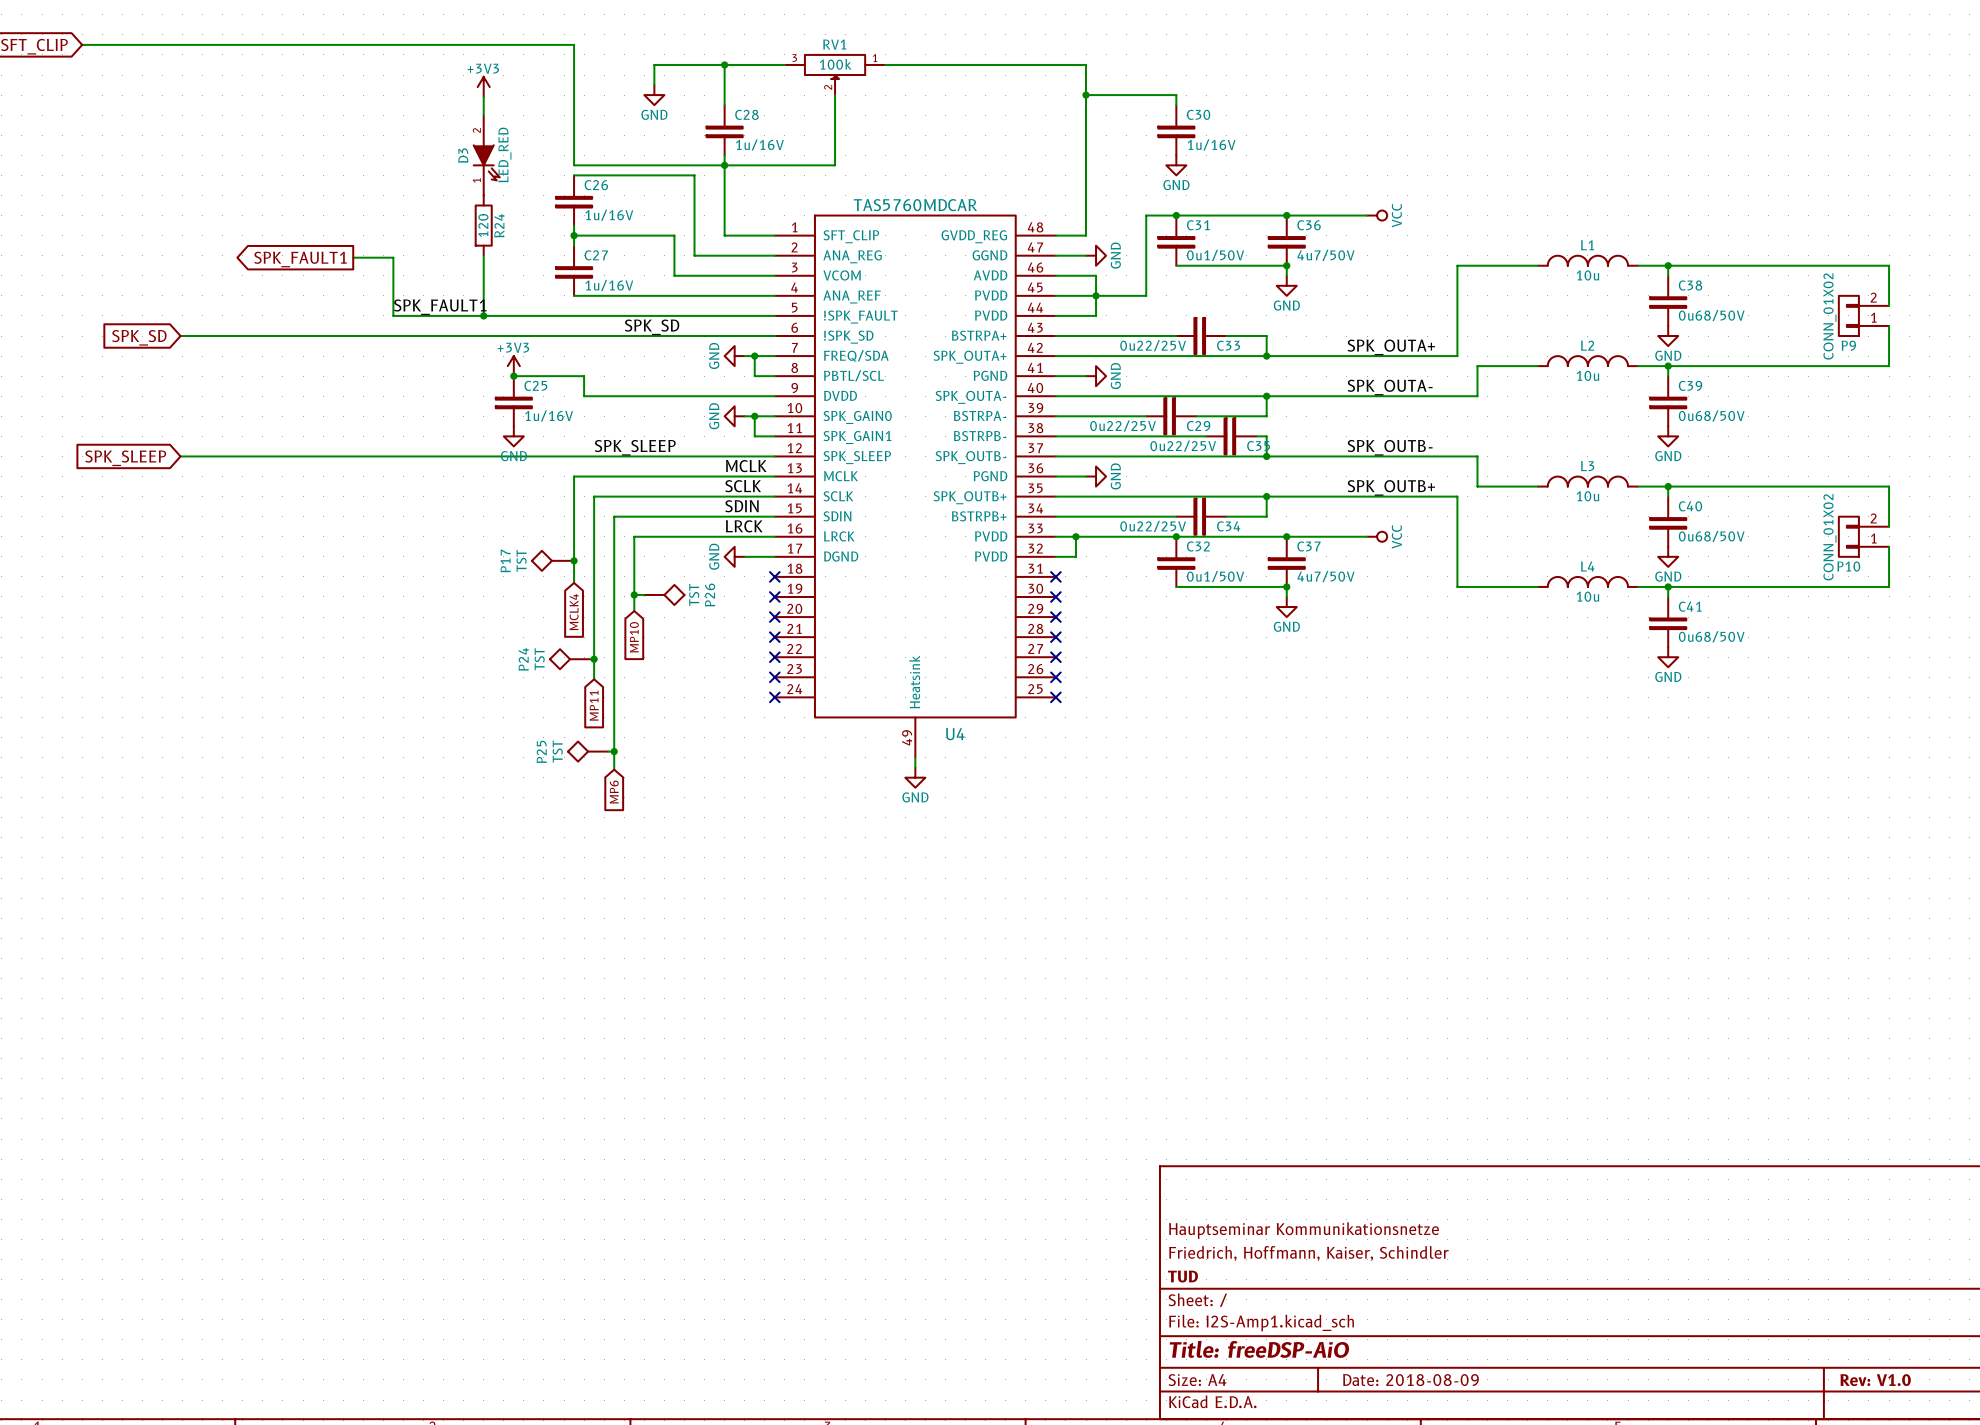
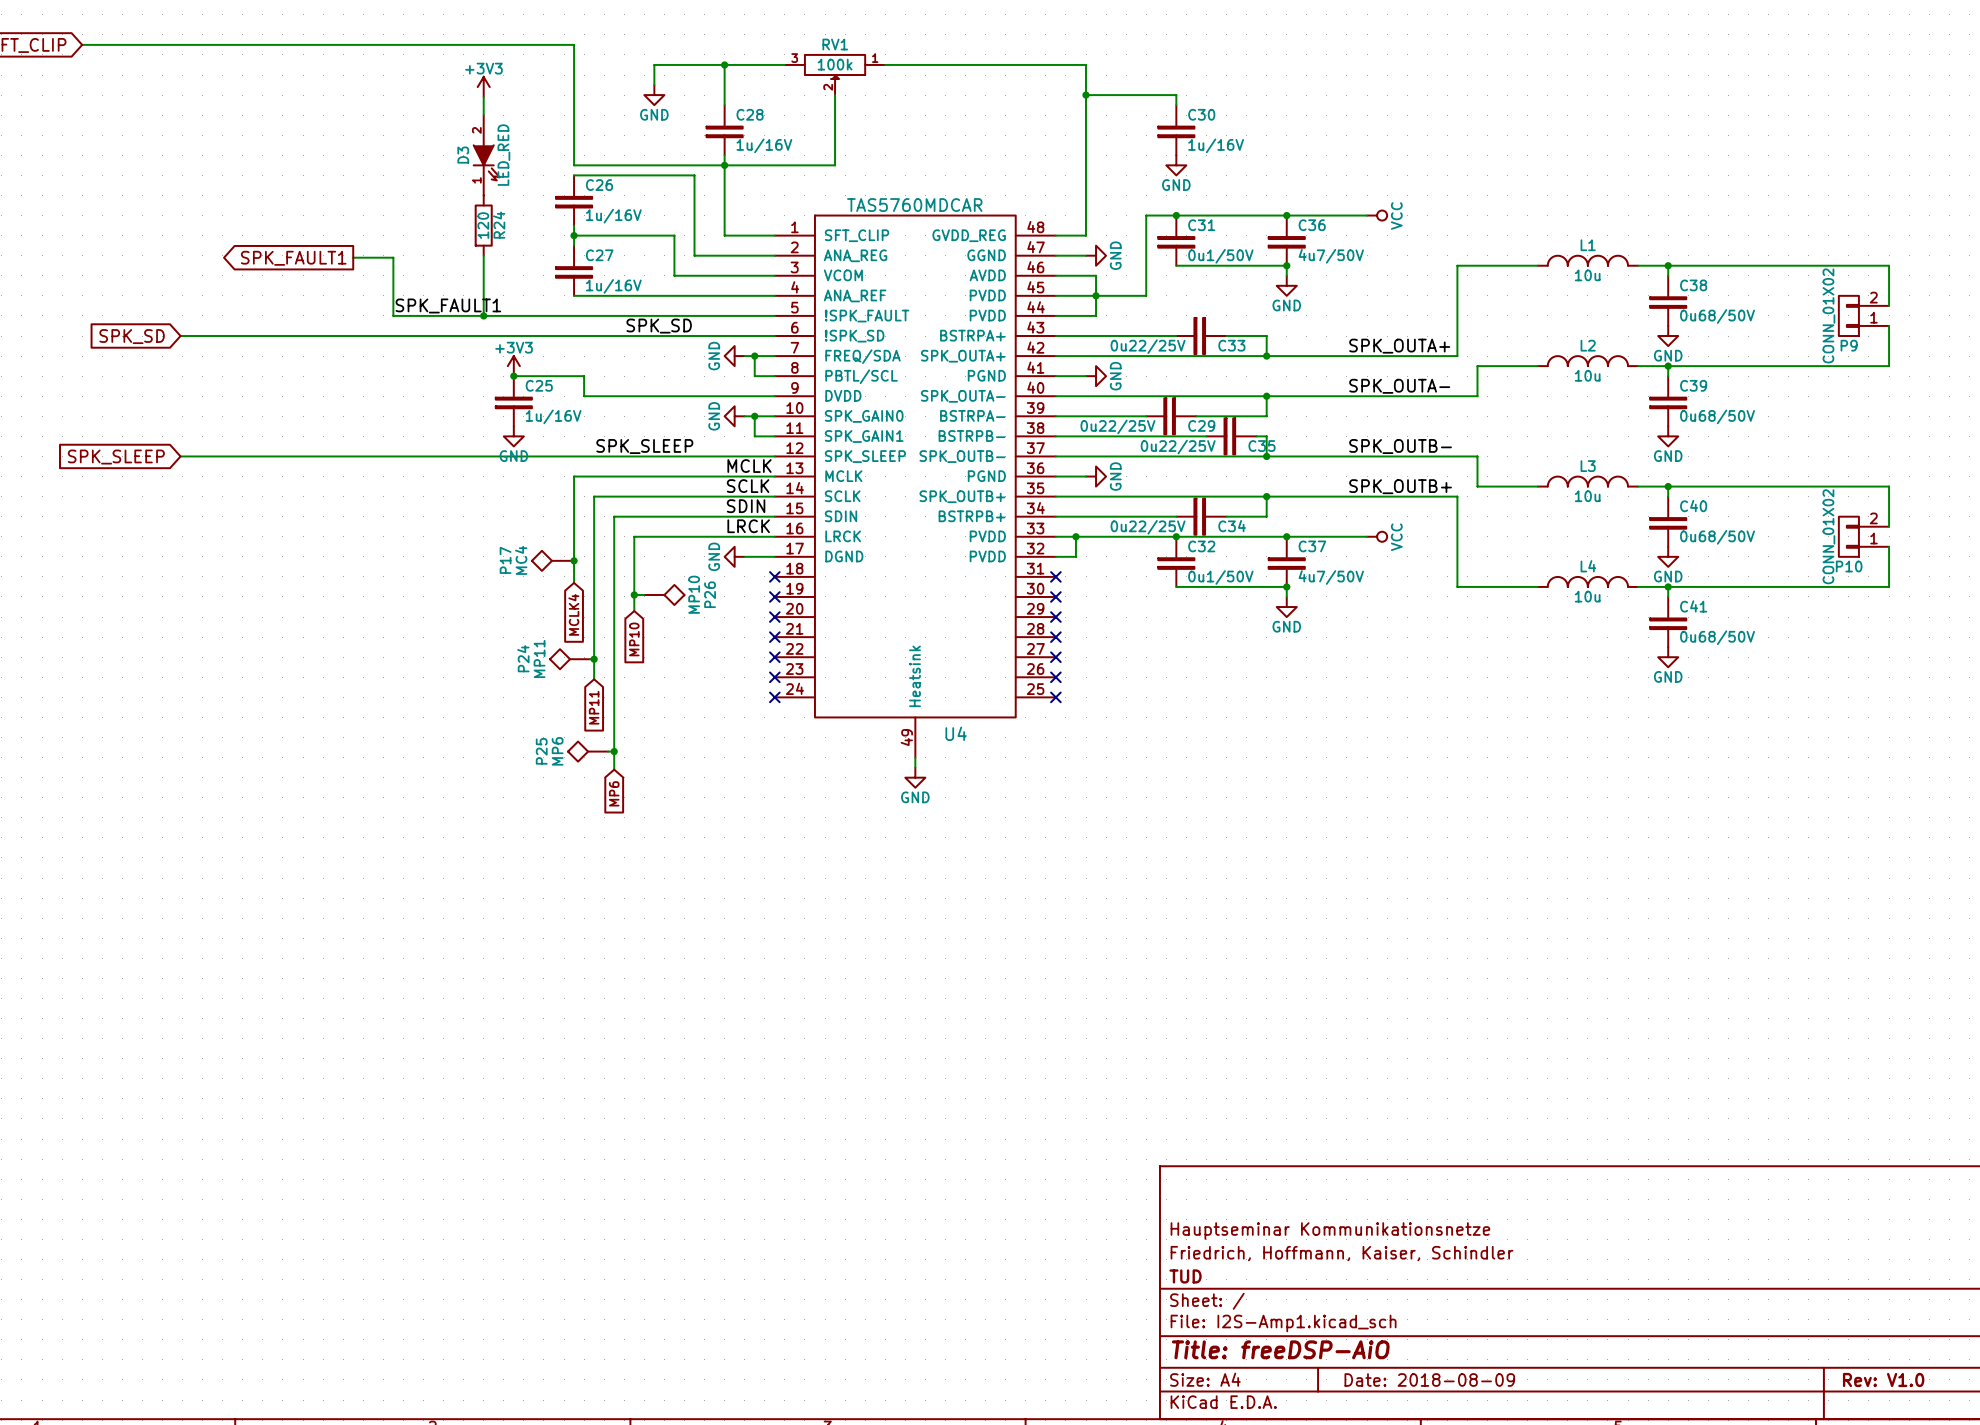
P17 value: TST (521, 560) -> MC4 (521, 560)
P26 value: TST (694, 594) -> MP10 (694, 594)
P24 value: TST (539, 659) -> MP11 (539, 658)
P25 value: TST (557, 751) -> MP6 (557, 751)

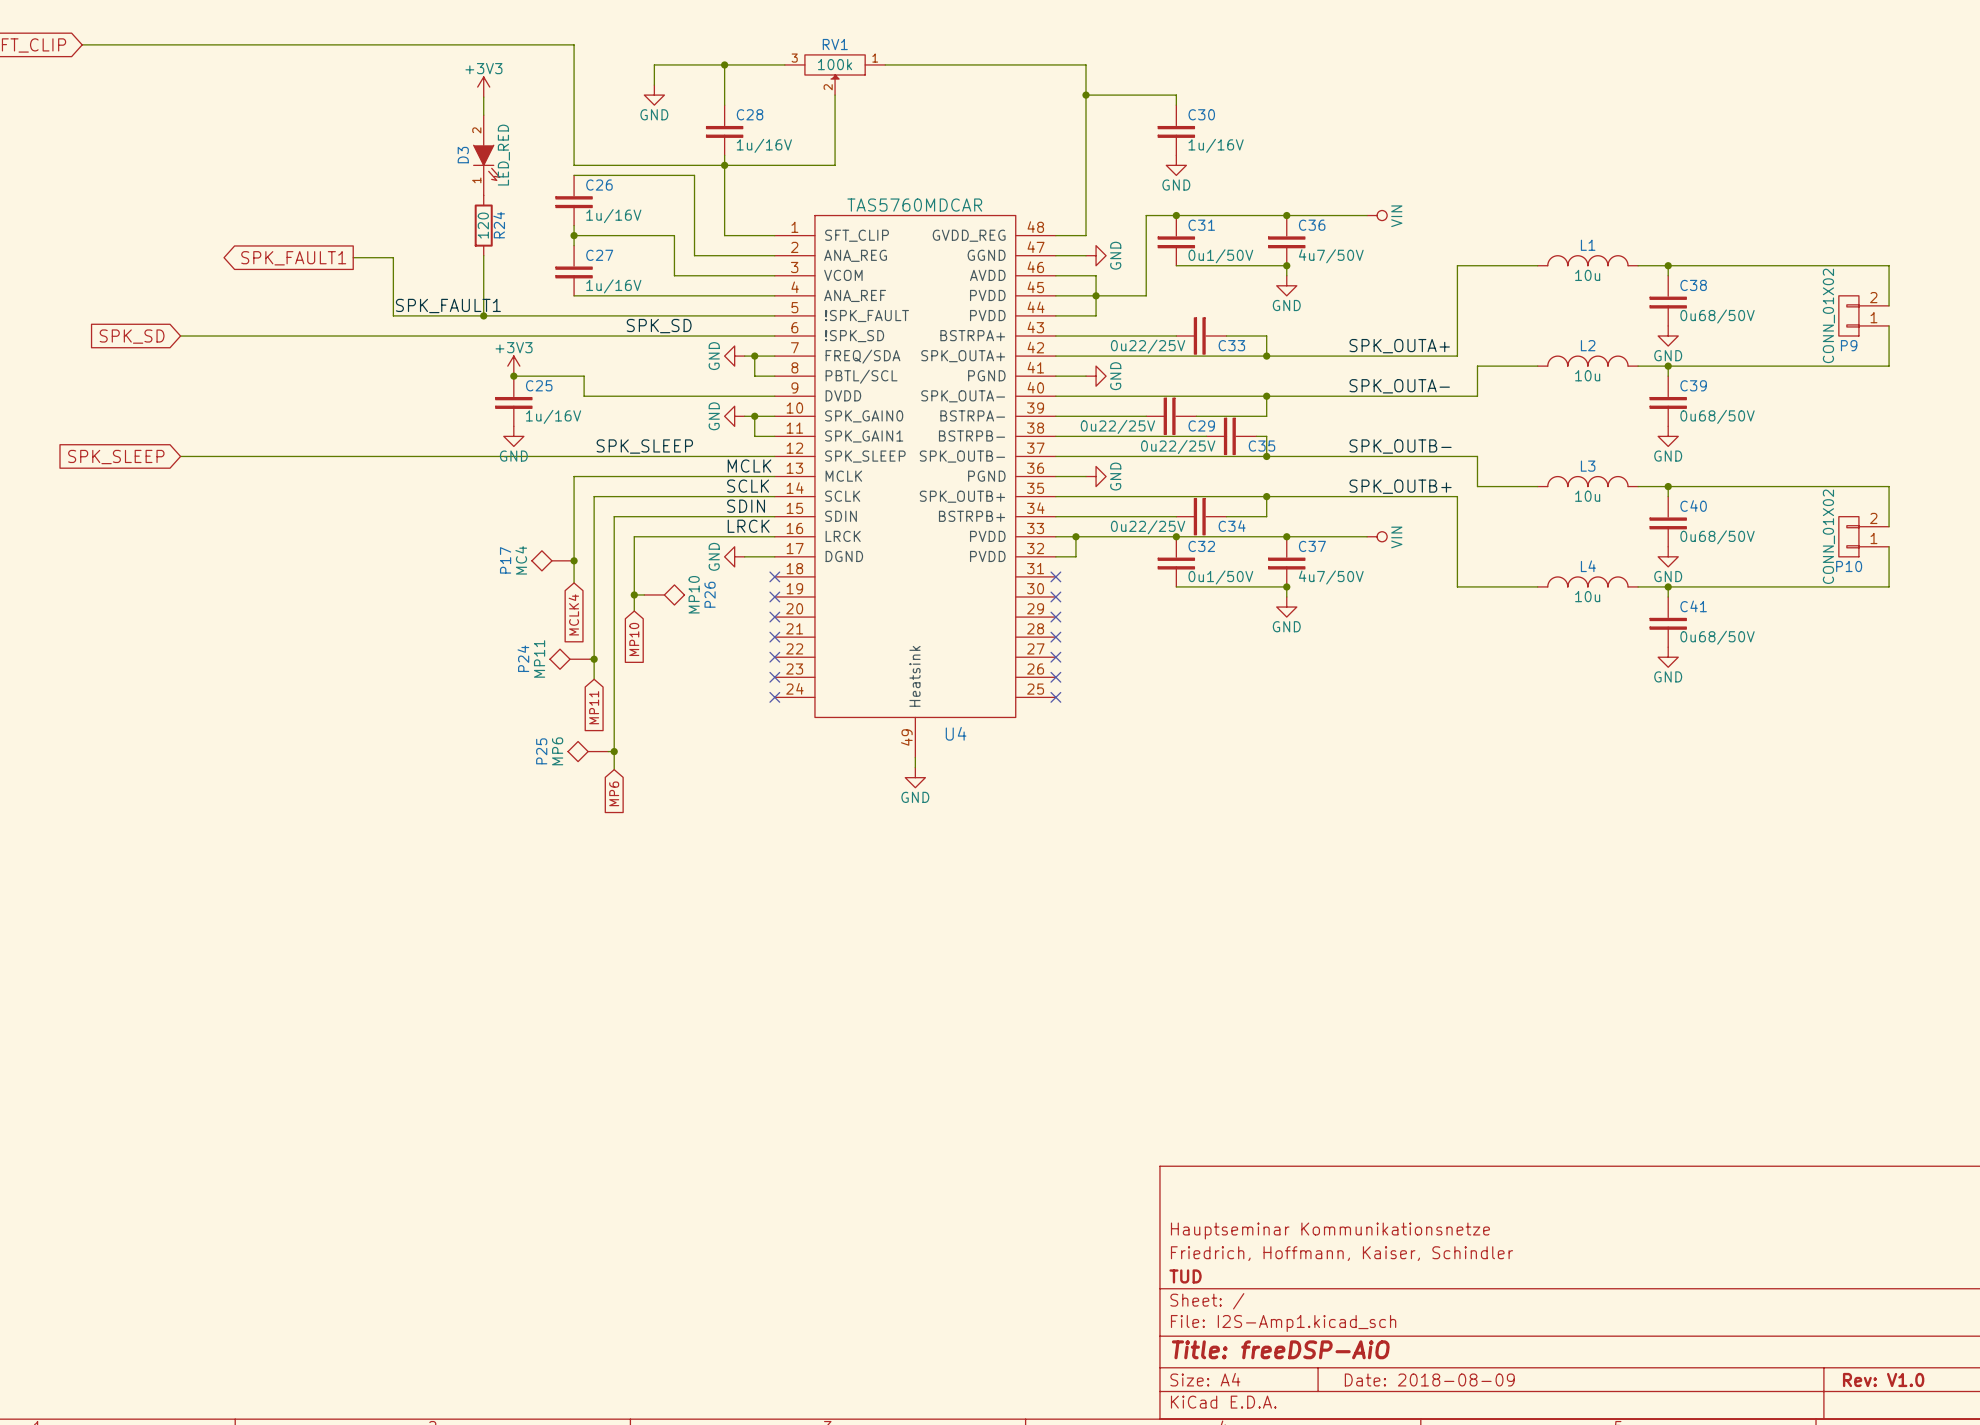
power symbol: VCC (1377, 215) -> VIN (1377, 215)
power symbol: VCC (1377, 536) -> VIN (1377, 536)

